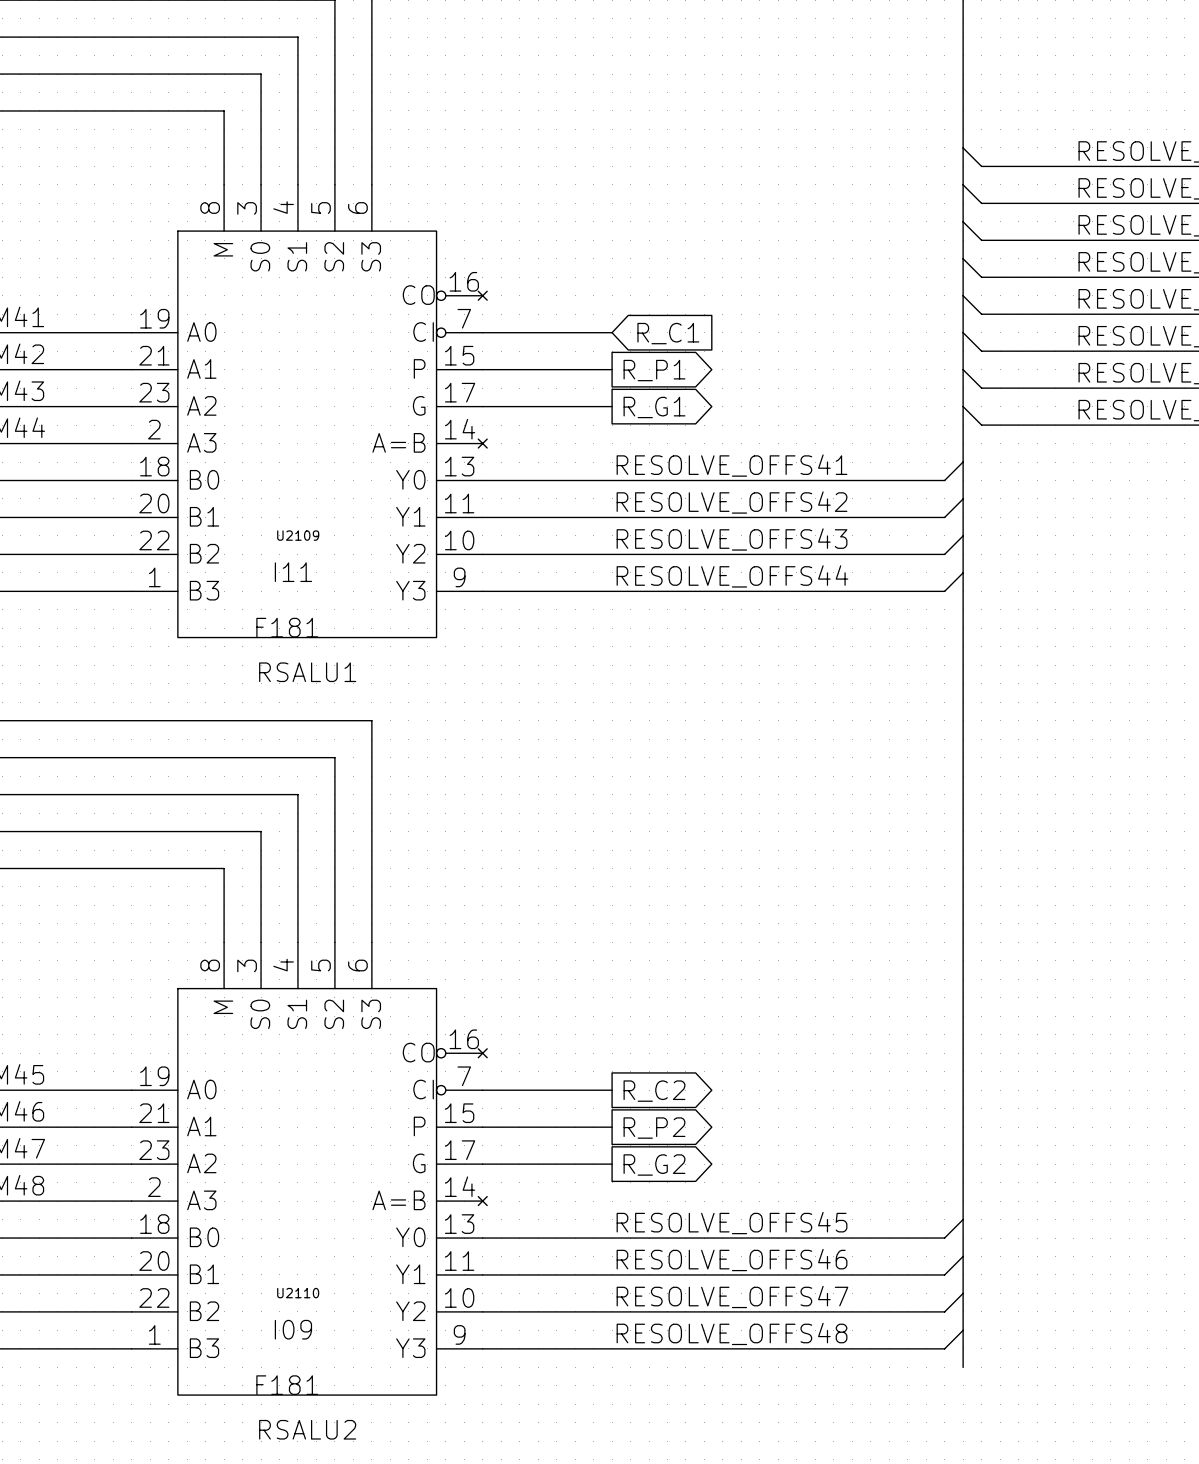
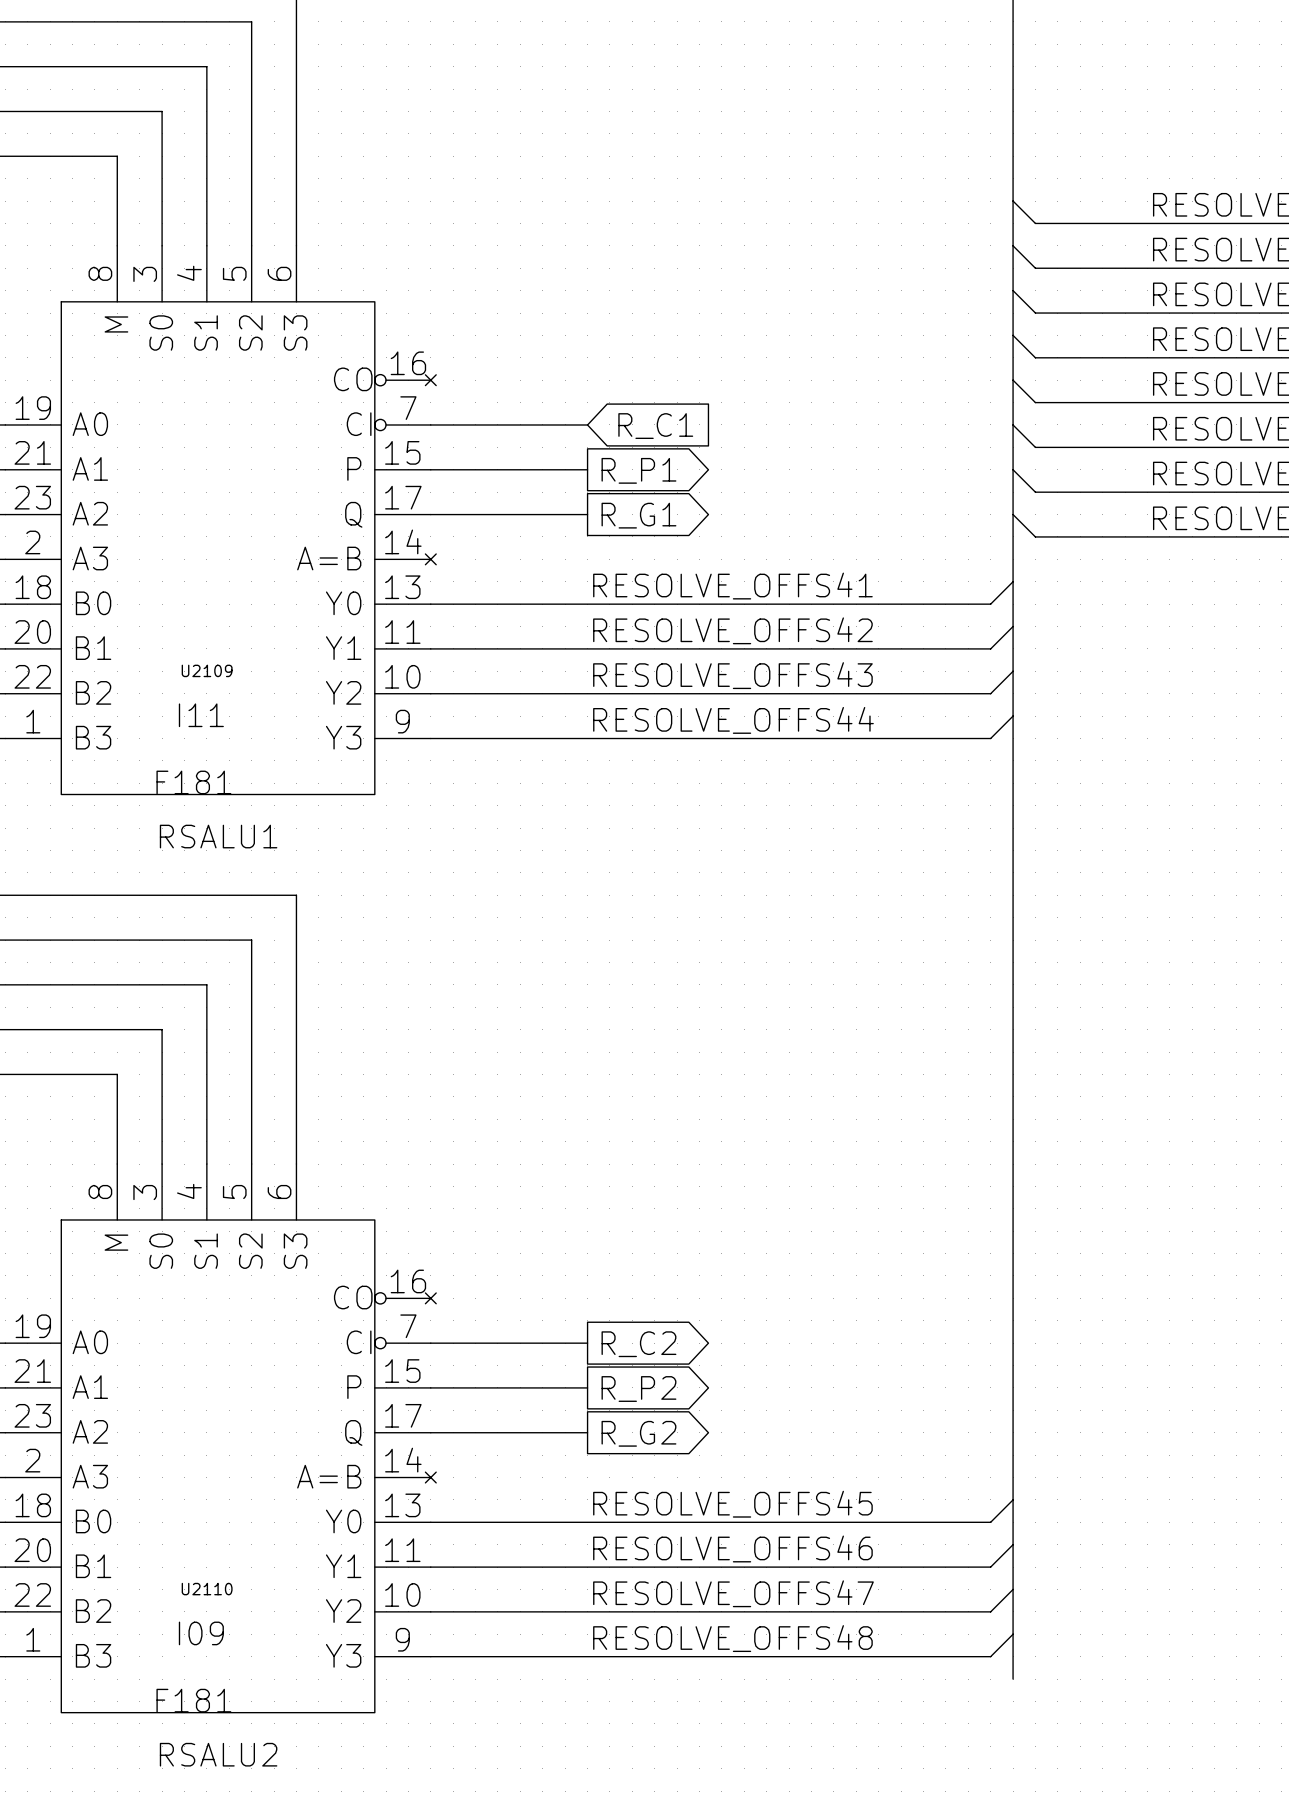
U2109 pin name: G (419, 405) -> Q (353, 514)
U2110 pin name: G (419, 1163) -> Q (353, 1432)

